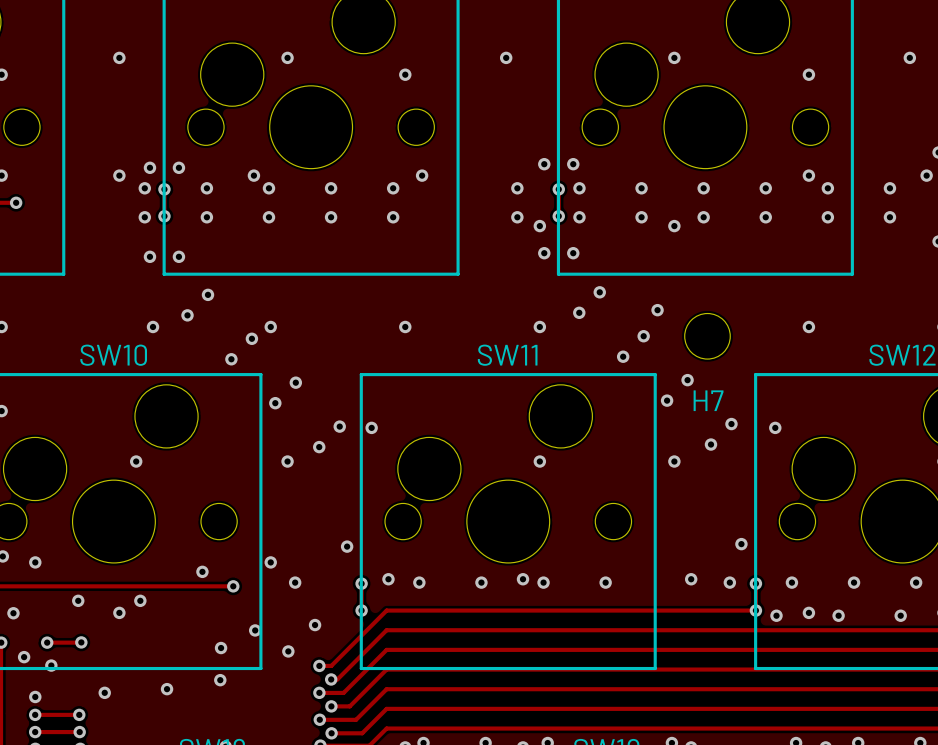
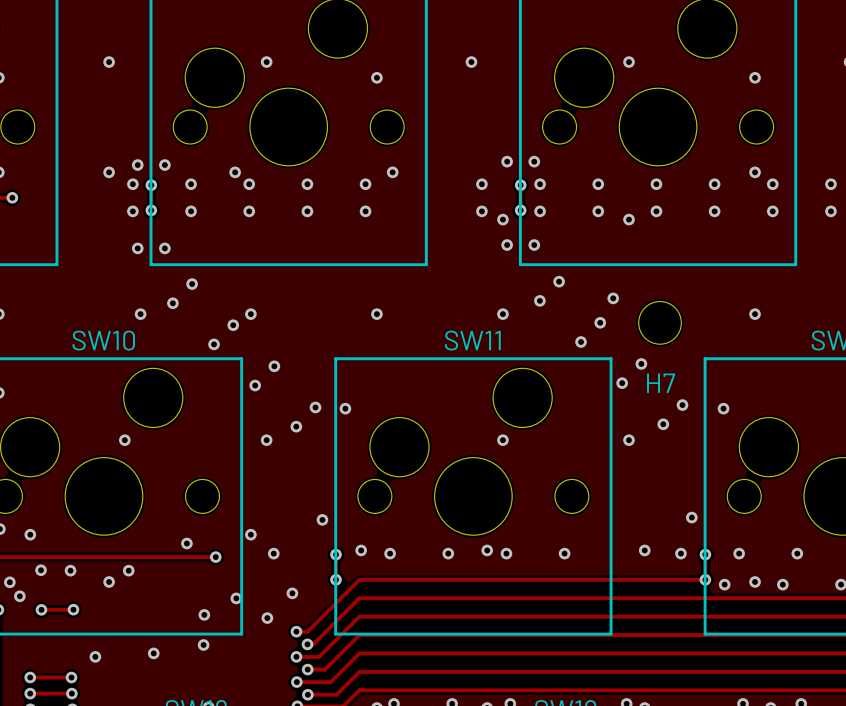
via: none -> (41, 570)
via: none -> (19, 596)
via: (24, 657) -> none
via: (51, 665) -> none
via: (35, 696) -> none

